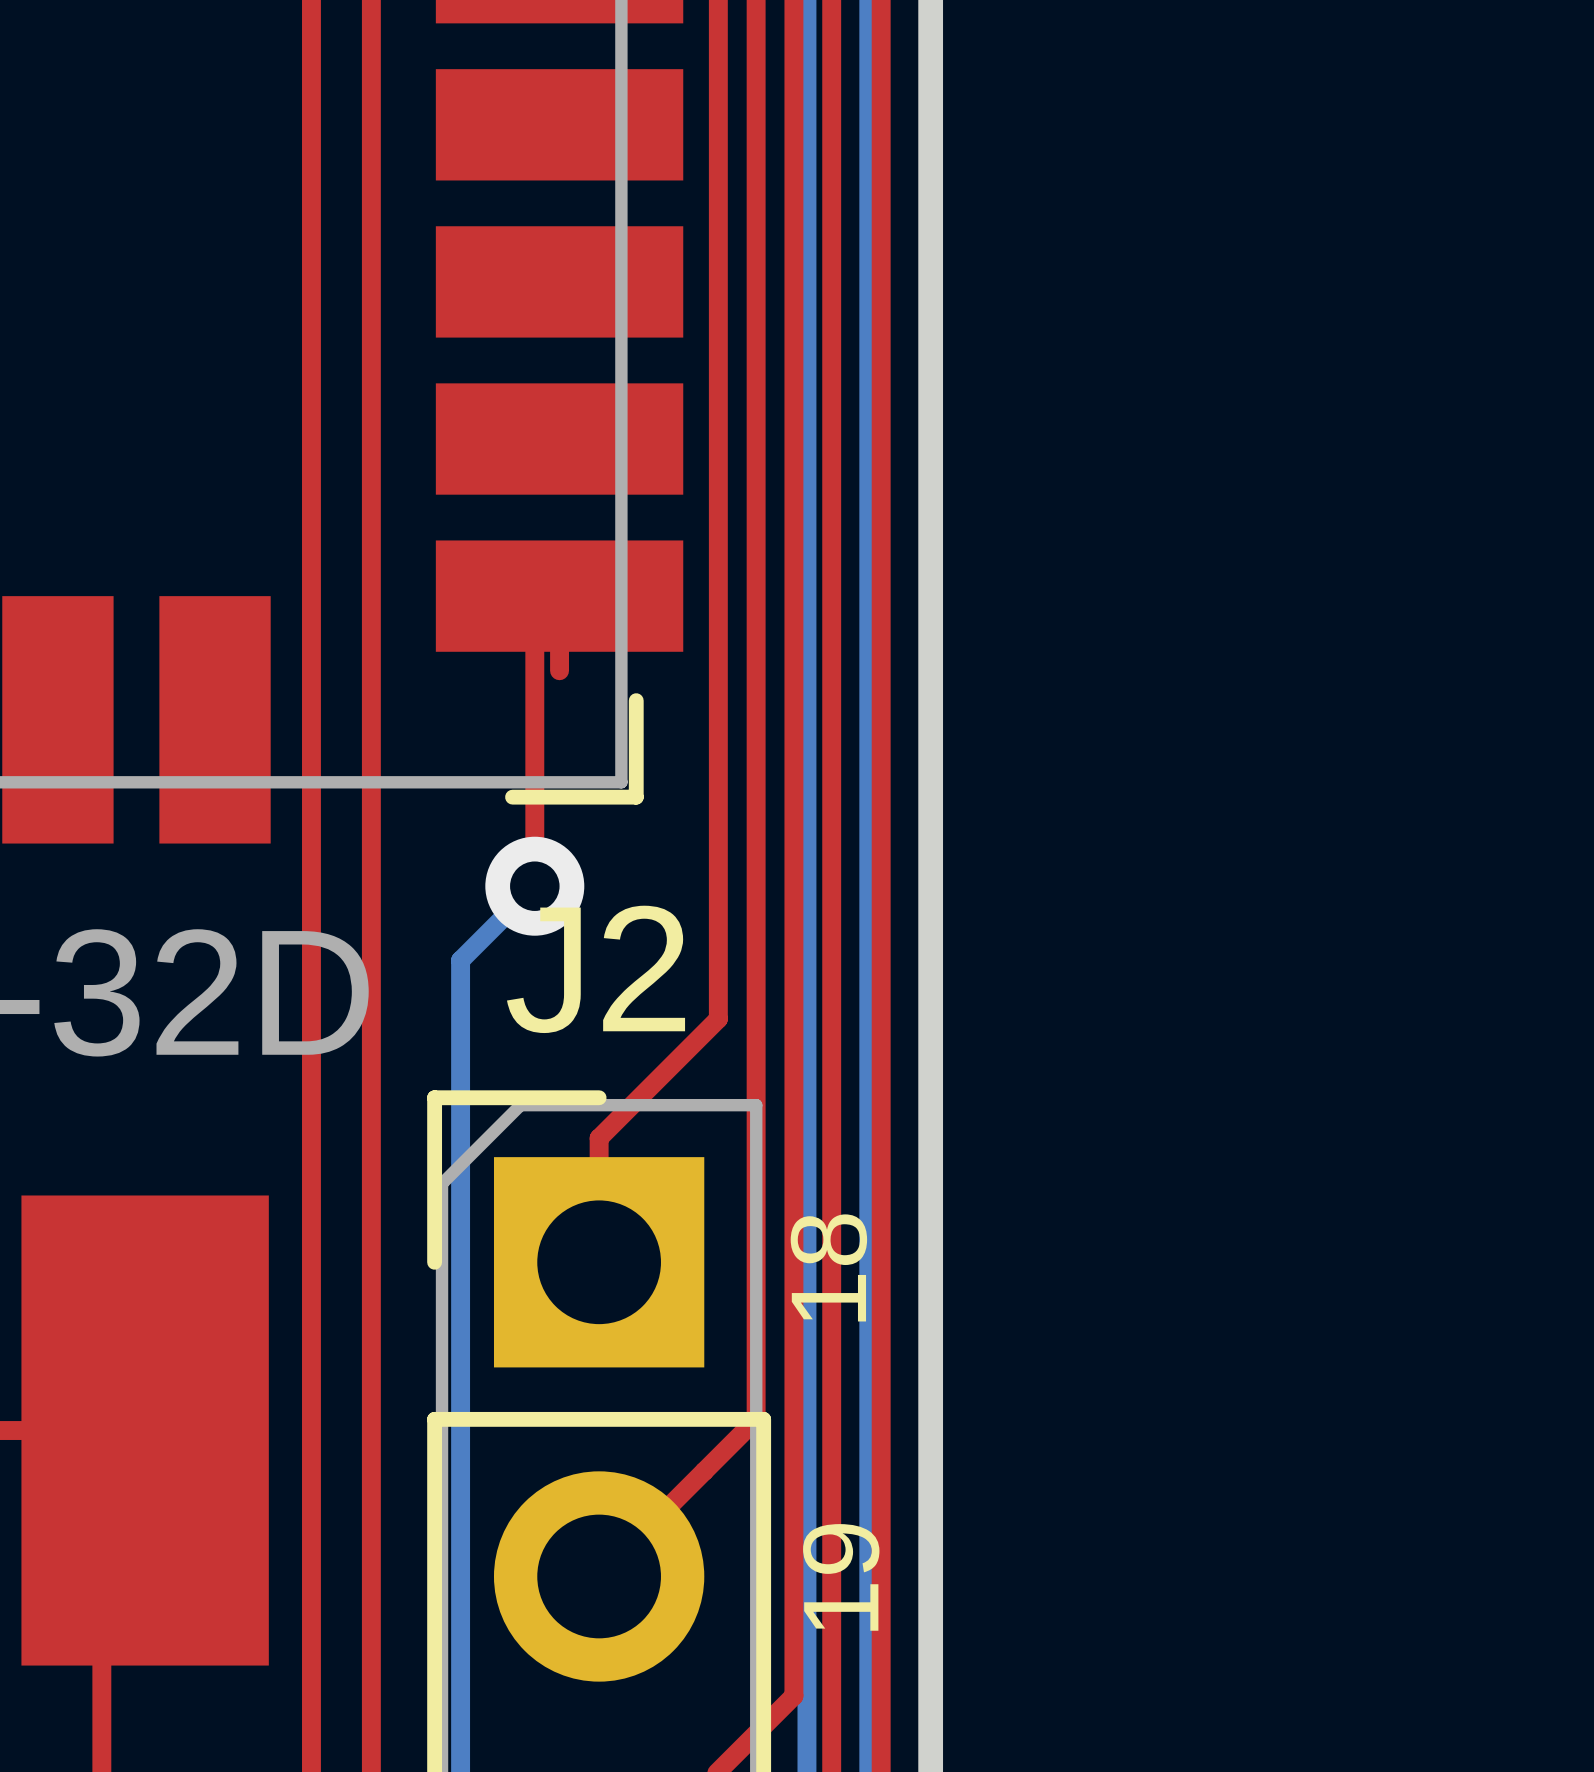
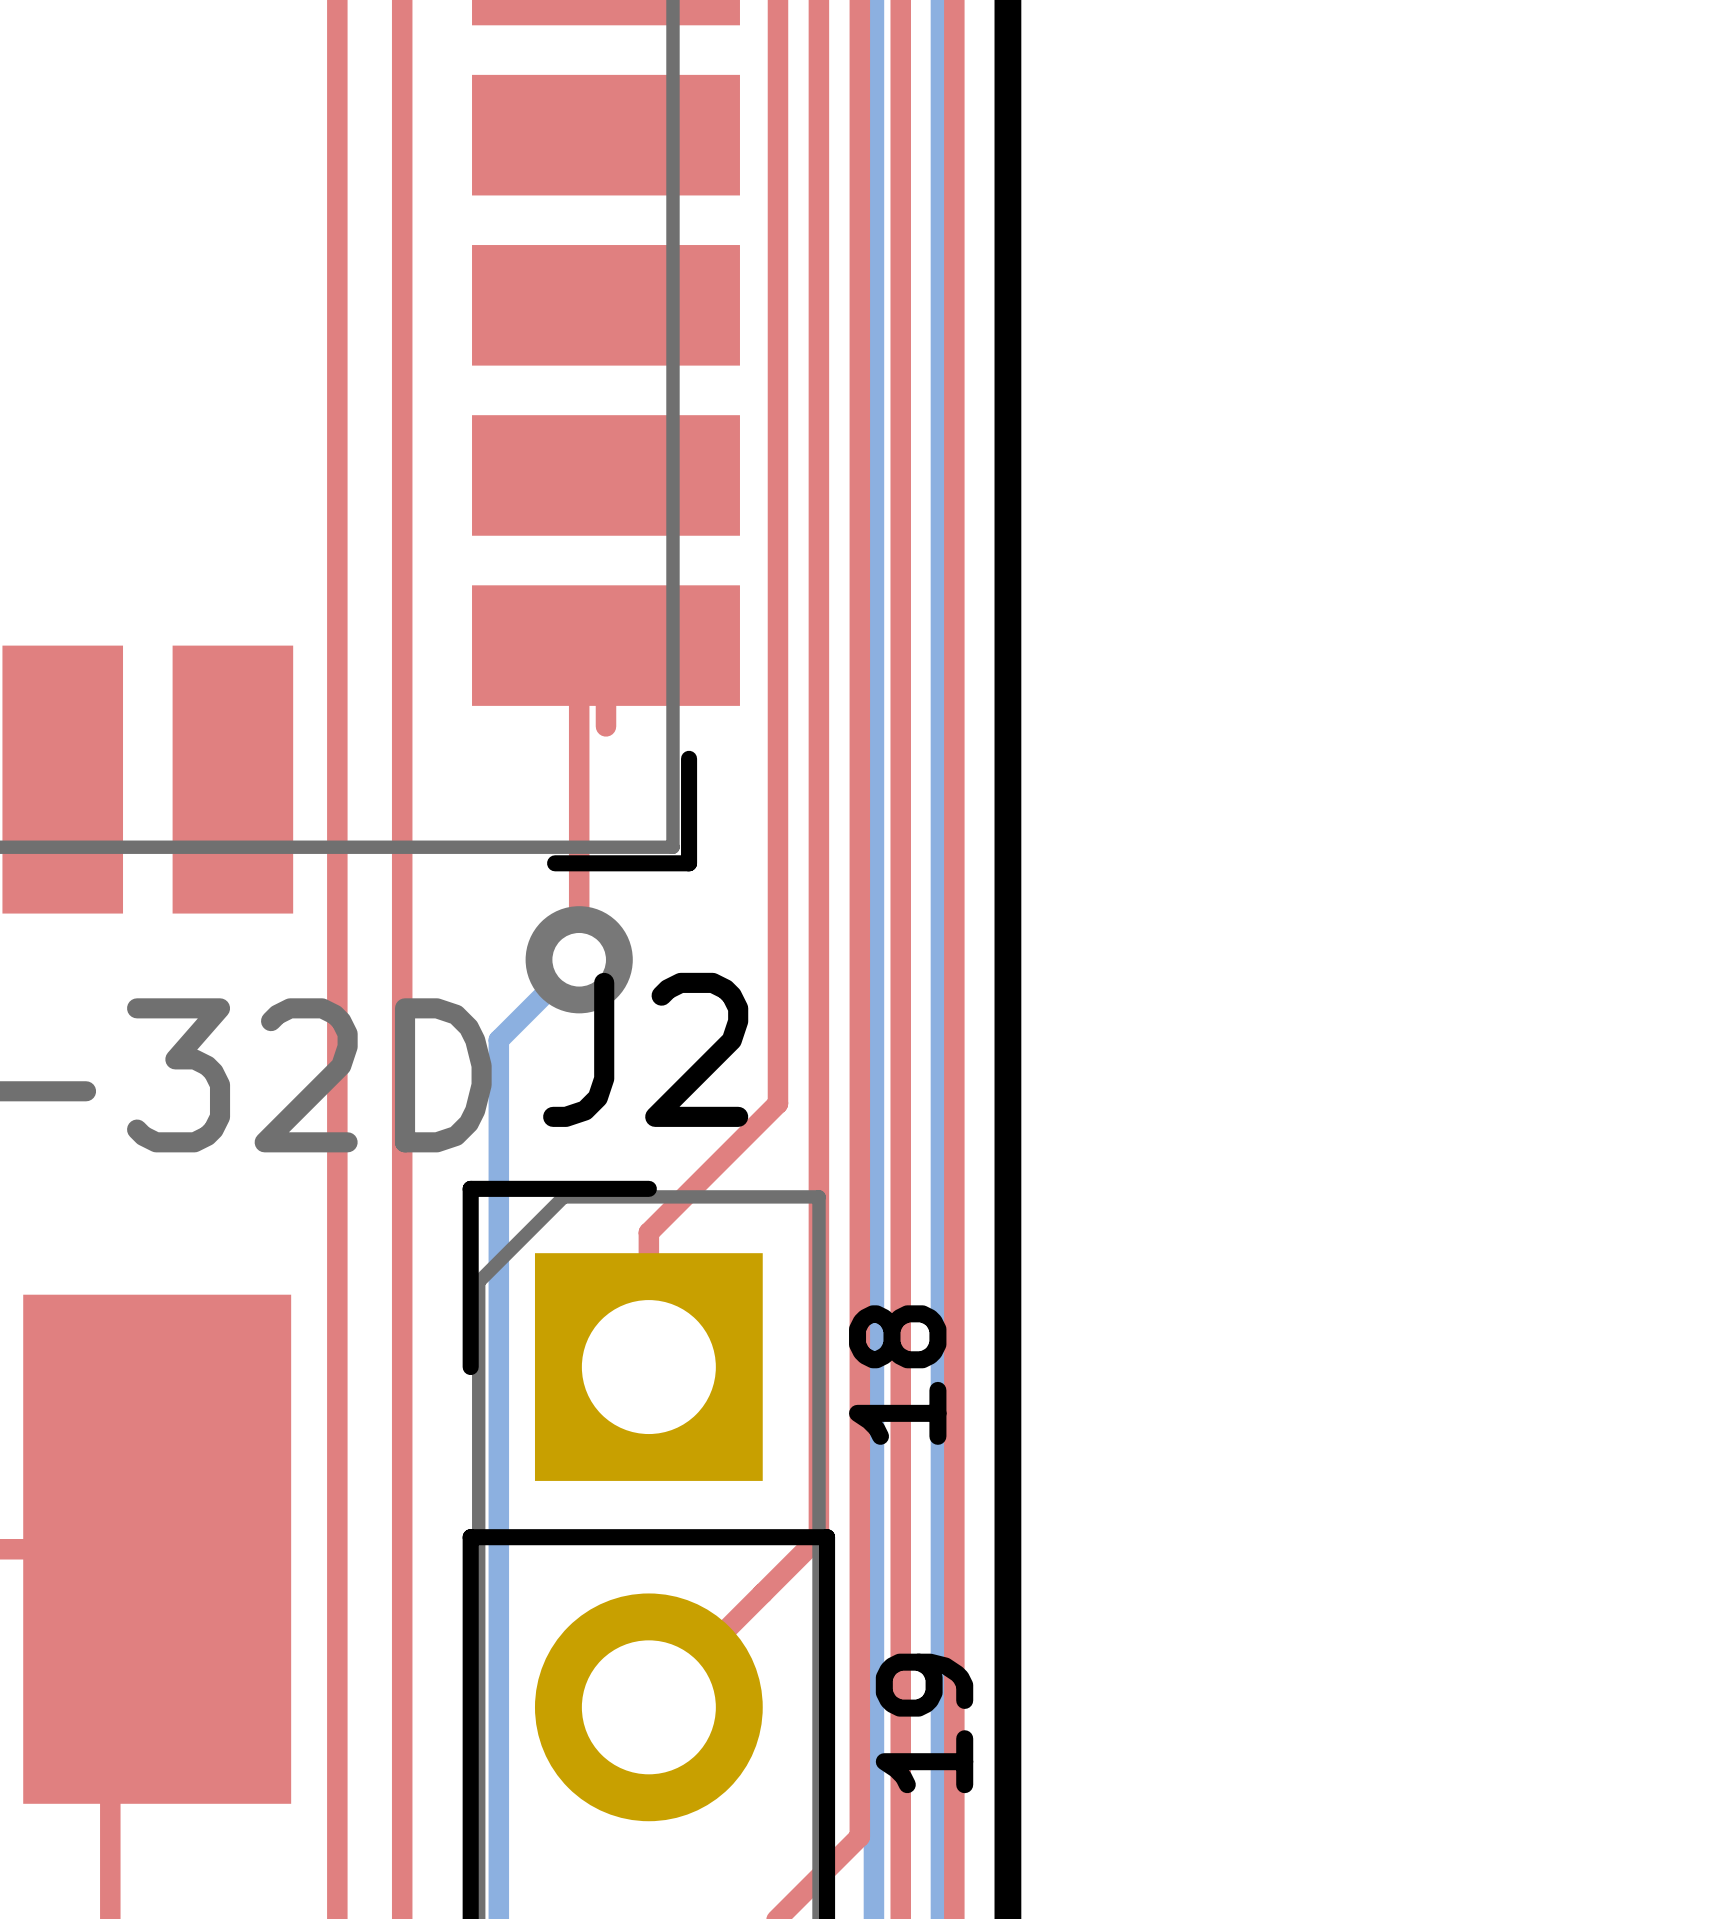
text position: 19 (841, 1577) -> 19 (924, 1723)

